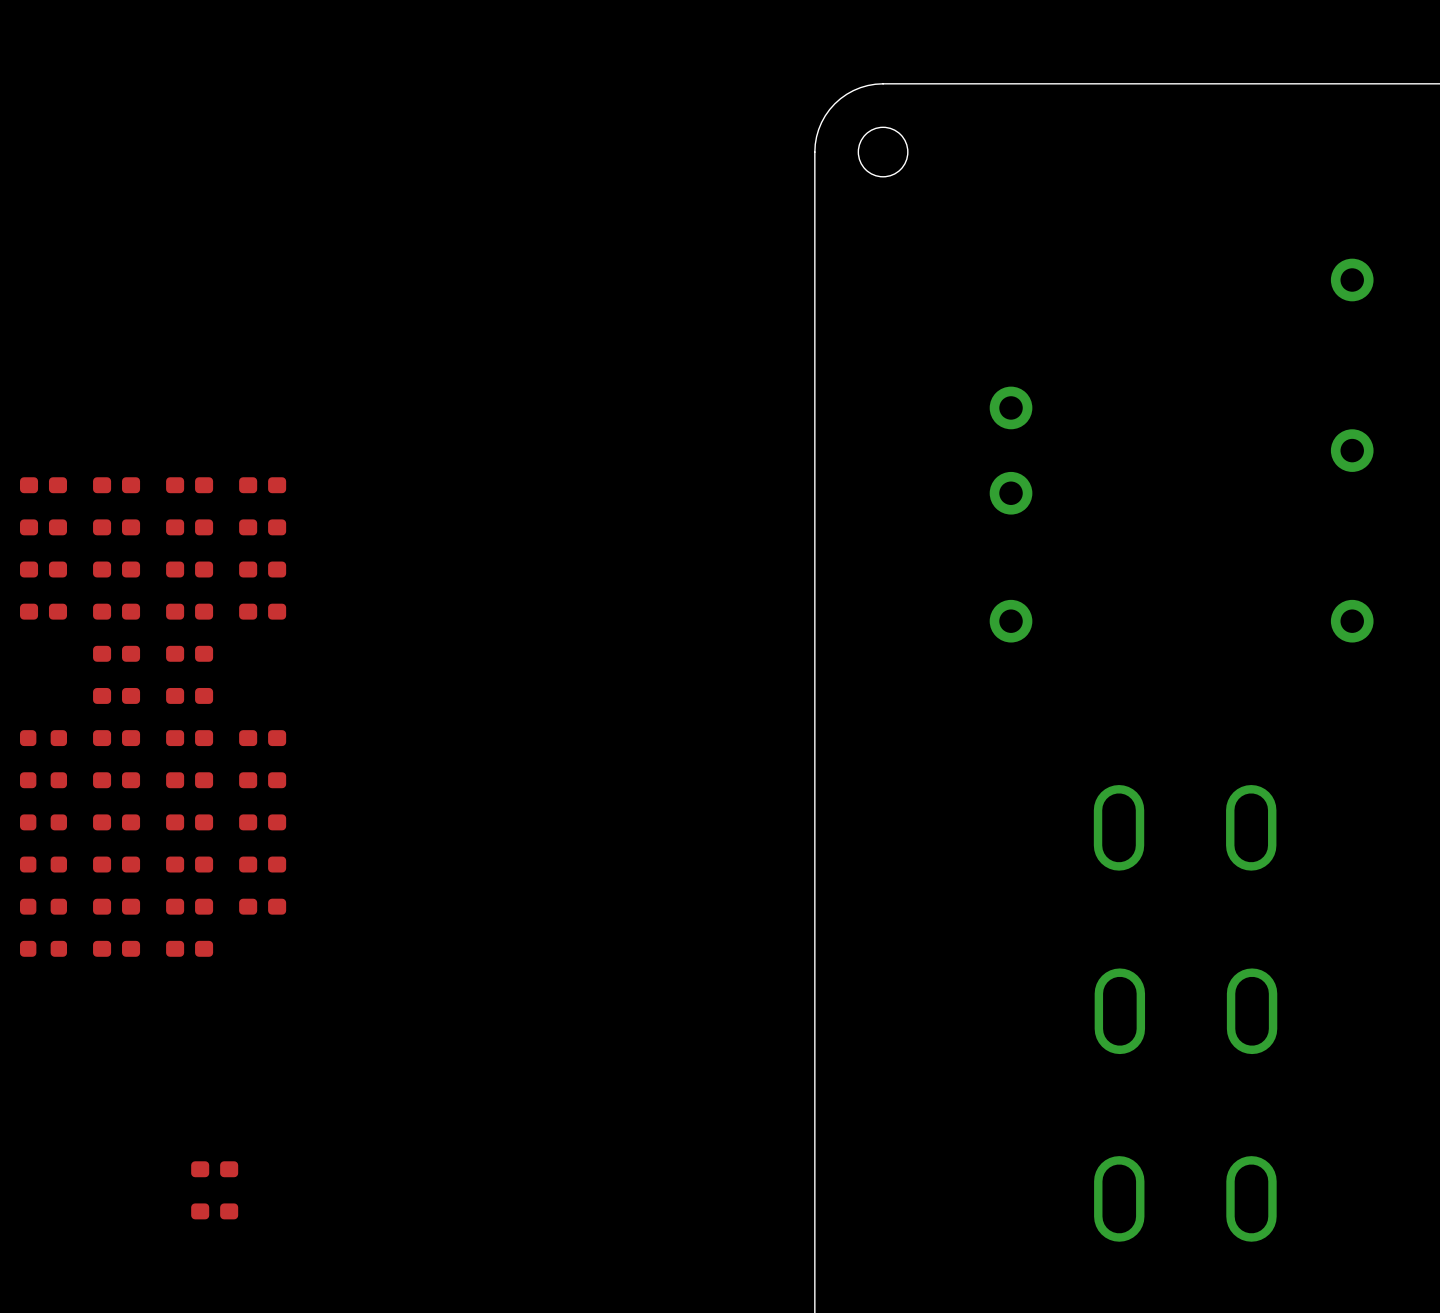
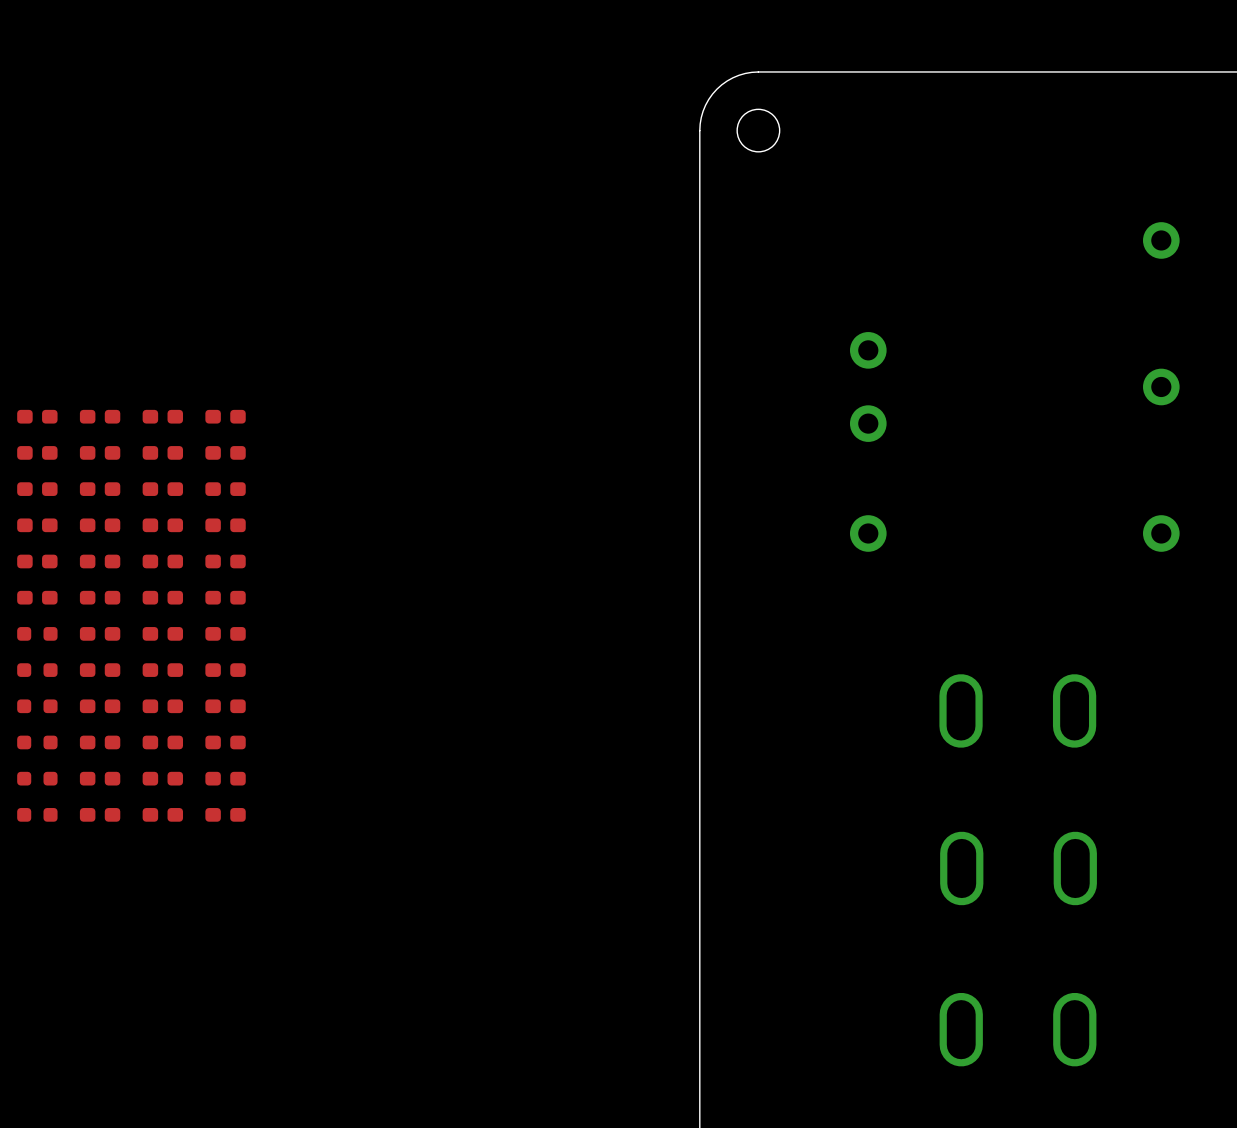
part: none -> (37, 561)
part: none -> (225, 561)
part: none -> (37, 597)
part: none -> (225, 597)
part: none -> (225, 814)
part: (214, 1169) -> none
part: (214, 1211) -> none

